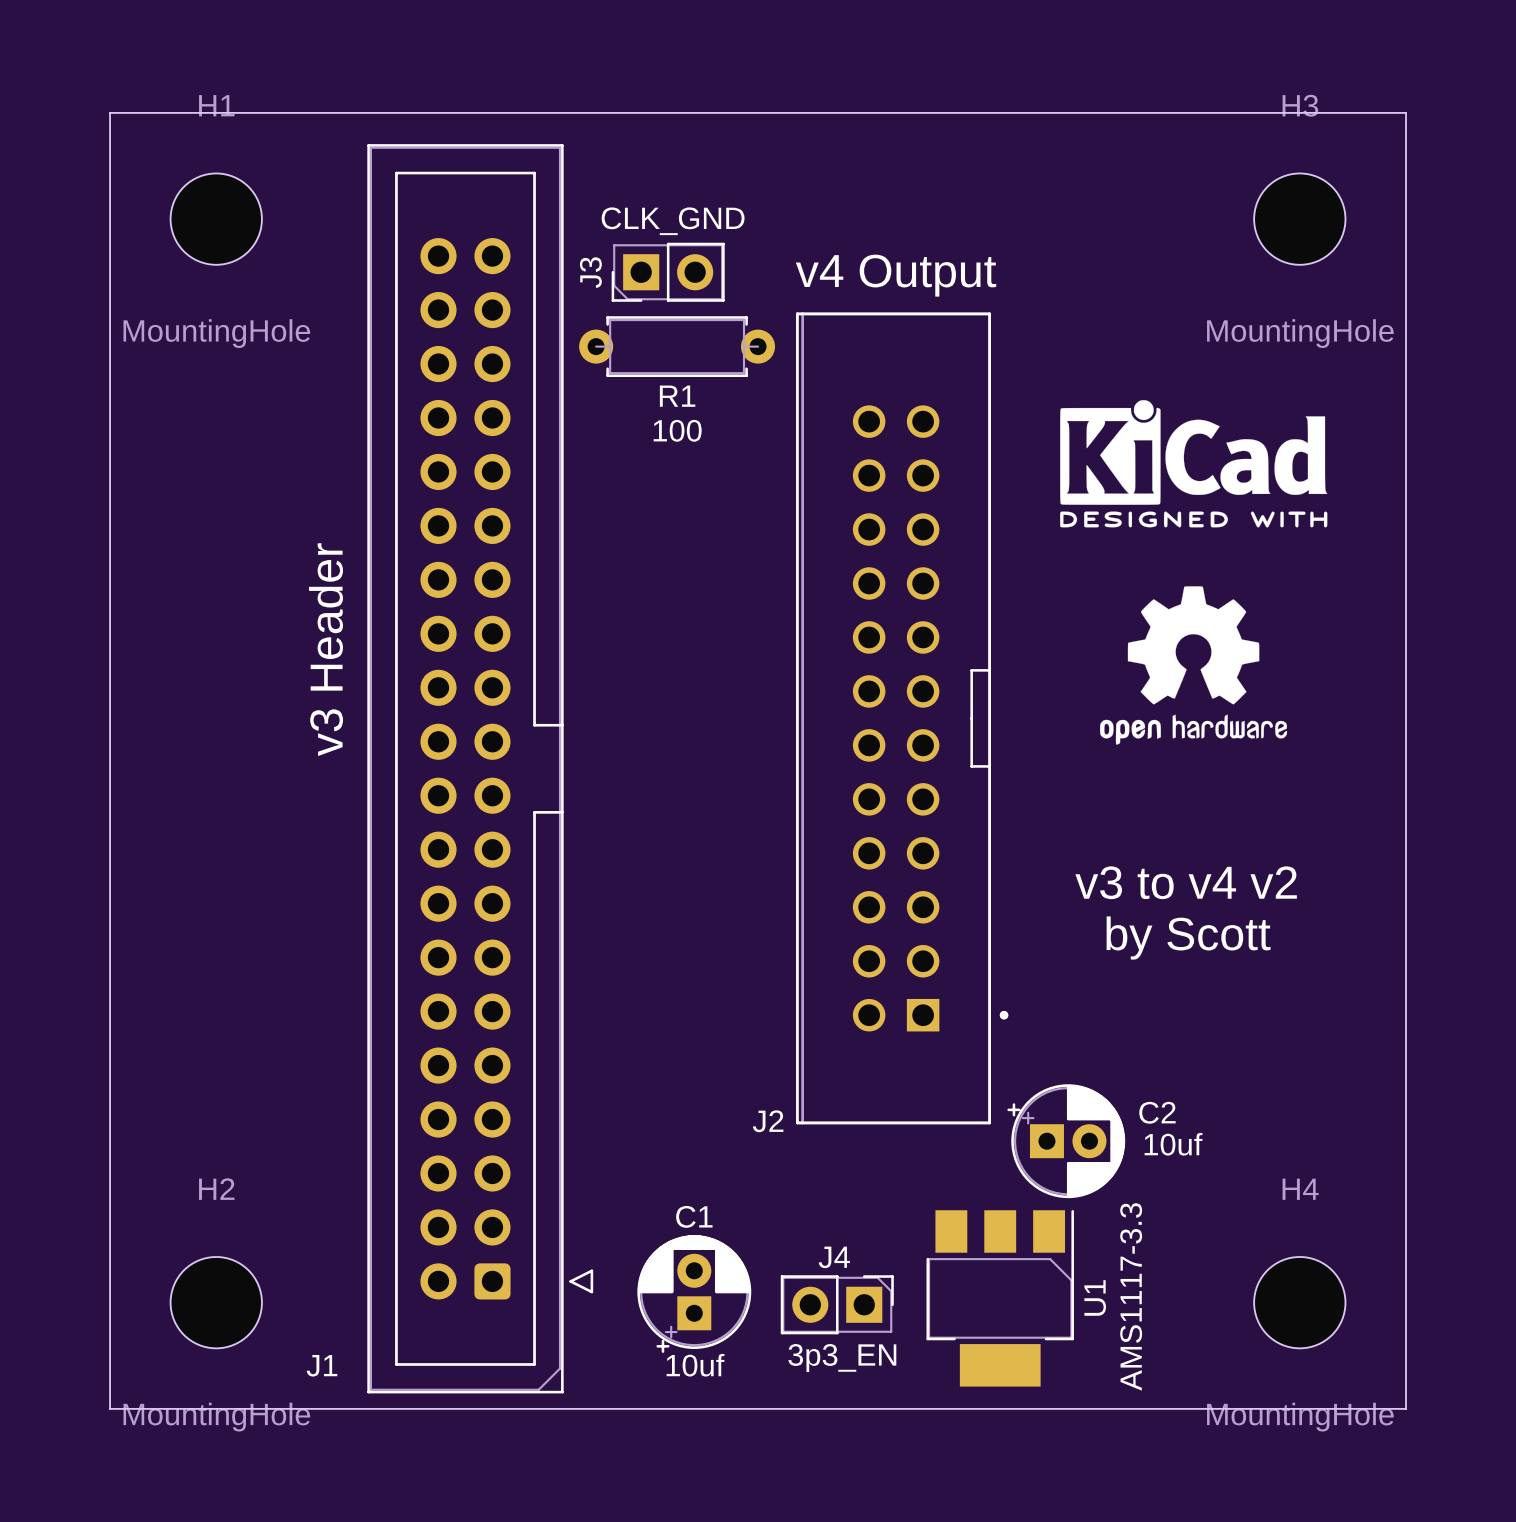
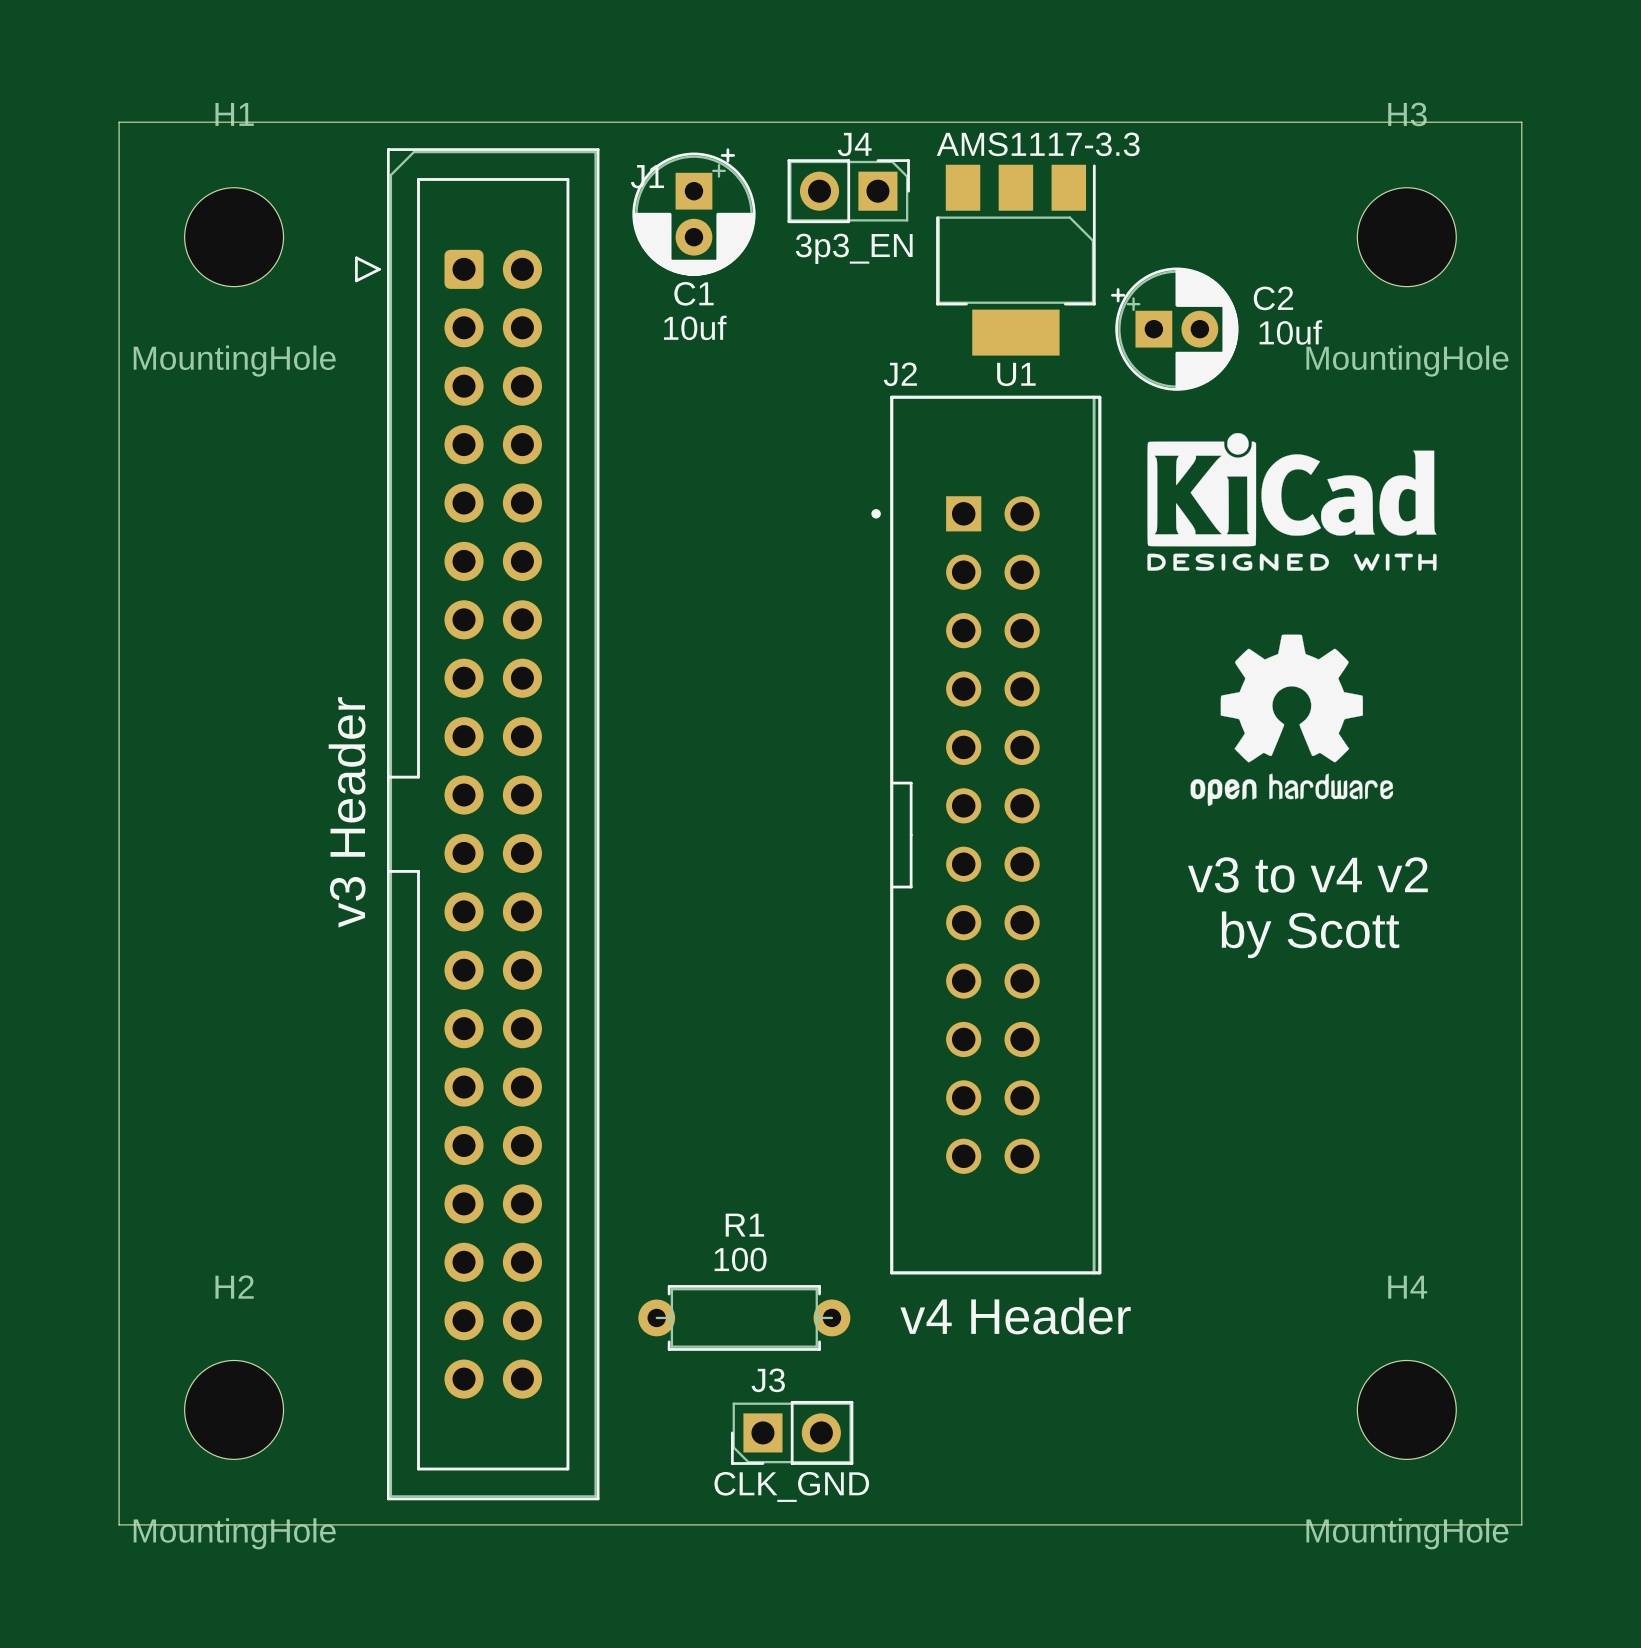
J3 value position: CLK_GND (673, 221) -> CLK_GND (791, 1486)
J3 name rotation: 0° (590, 272) -> 90° clockwise (768, 1380)
J3 name position: J3 (590, 272) -> J3 (768, 1380)
J3 position: (668, 272) -> (792, 1432)
J2 value: v4 Output (896, 275) -> v4 Header (1015, 1315)
R1 position: (677, 346) -> (744, 1317)
R1 name position: R1 (677, 396) -> R1 (744, 1225)
R1 value position: 100 (677, 430) -> 100 (740, 1259)
J1 value position: v3 Header (325, 649) -> v3 Header (347, 812)
J2 rotation: 0° (902, 718) -> 180° (986, 835)
J1 rotation: 0° (480, 768) -> 180° (477, 824)
text position: v3 to v4 v2 (1186, 882) -> v3 to v4 v2 (1307, 874)
text position: by Scott (1188, 938) -> by Scott (1310, 934)
J2 name position: J2 (768, 1121) -> J2 (900, 374)
C2 position: (1066, 1141) -> (1174, 329)
J4 name position: J4 (834, 1257) -> J4 (854, 144)
C1 rotation: 0° (694, 1294) -> 180° (693, 212)
C1 position: (694, 1294) -> (693, 212)
U1 value rotation: 0° (1131, 1296) -> 90° clockwise (1038, 144)
U1 name rotation: 0° (1095, 1297) -> 90° clockwise (1016, 374)
U1 name position: U1 (1095, 1297) -> U1 (1016, 374)
U1 position: (1000, 1298) -> (1015, 260)
J4 position: (837, 1304) -> (848, 191)

